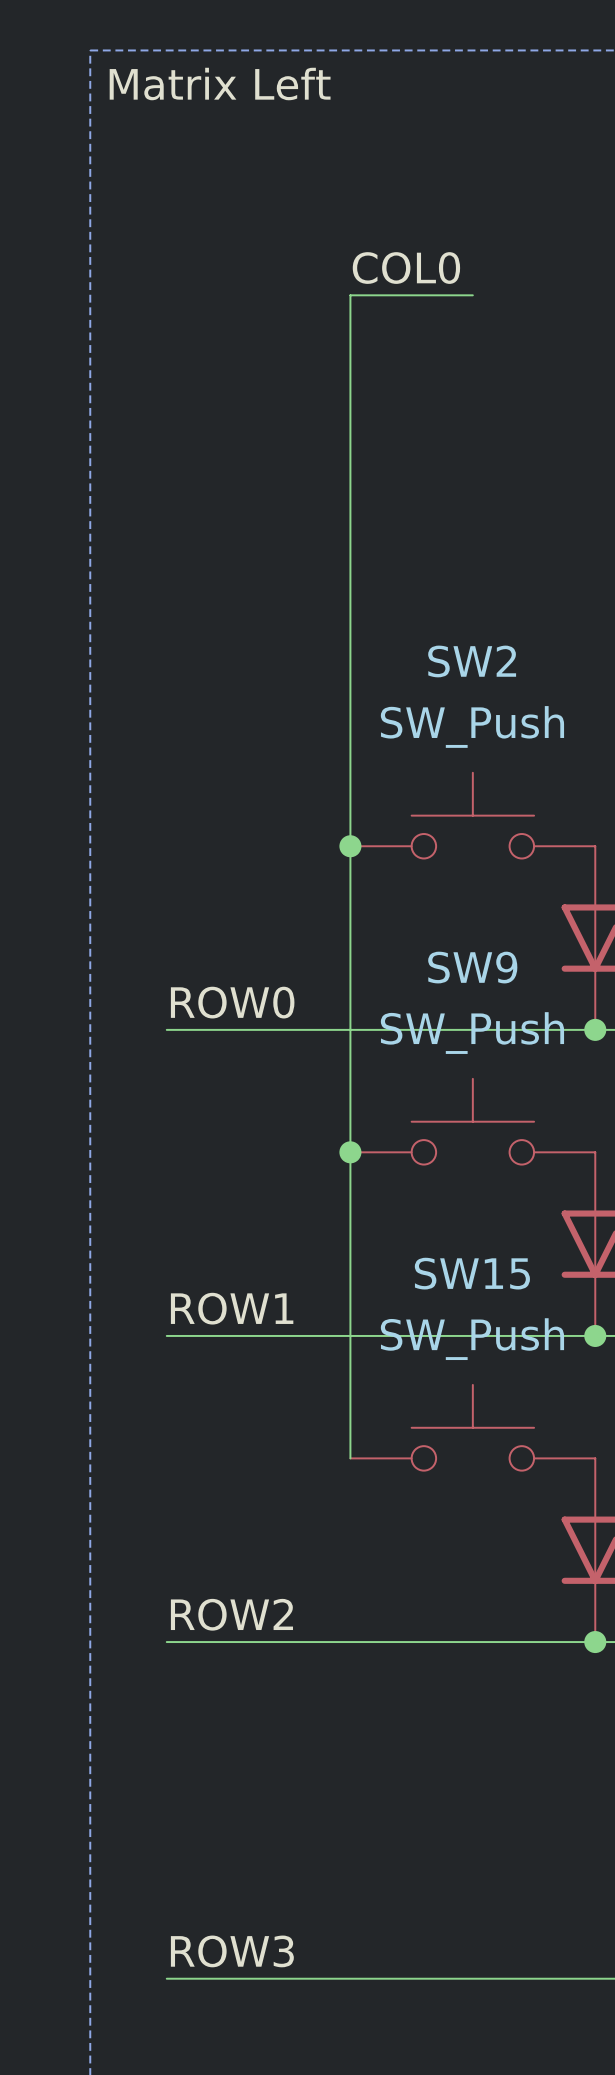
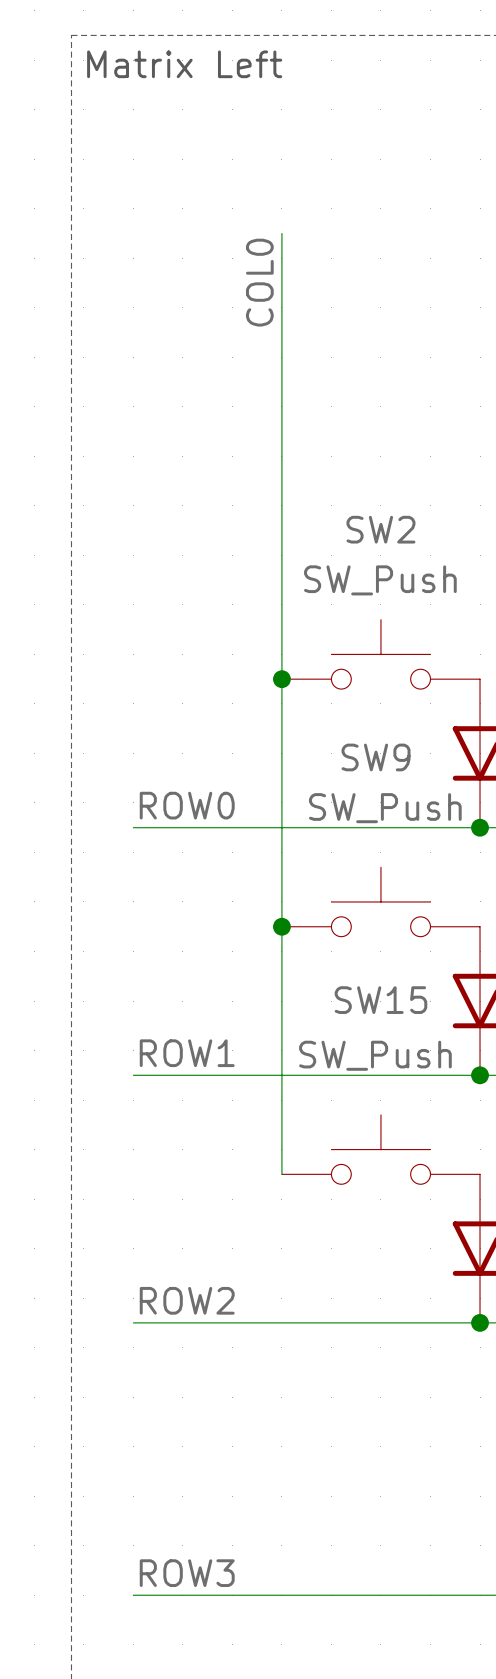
label: Matrix Left (220, 84) -> none
text: none -> Matrix Left (184, 64)
label rotation: 0° (406, 268) -> 90° counterclockwise (259, 282)
wire: (350, 295) (472, 295) -> none
SW9 name position: SW9 (472, 967) -> SW9 (376, 757)
SW9 value position: SW_Push (472, 1033) -> SW_Push (385, 808)
SW15 name position: SW15 (472, 1273) -> SW15 (380, 1000)
SW15 value position: SW_Push (472, 1339) -> SW_Push (375, 1055)

